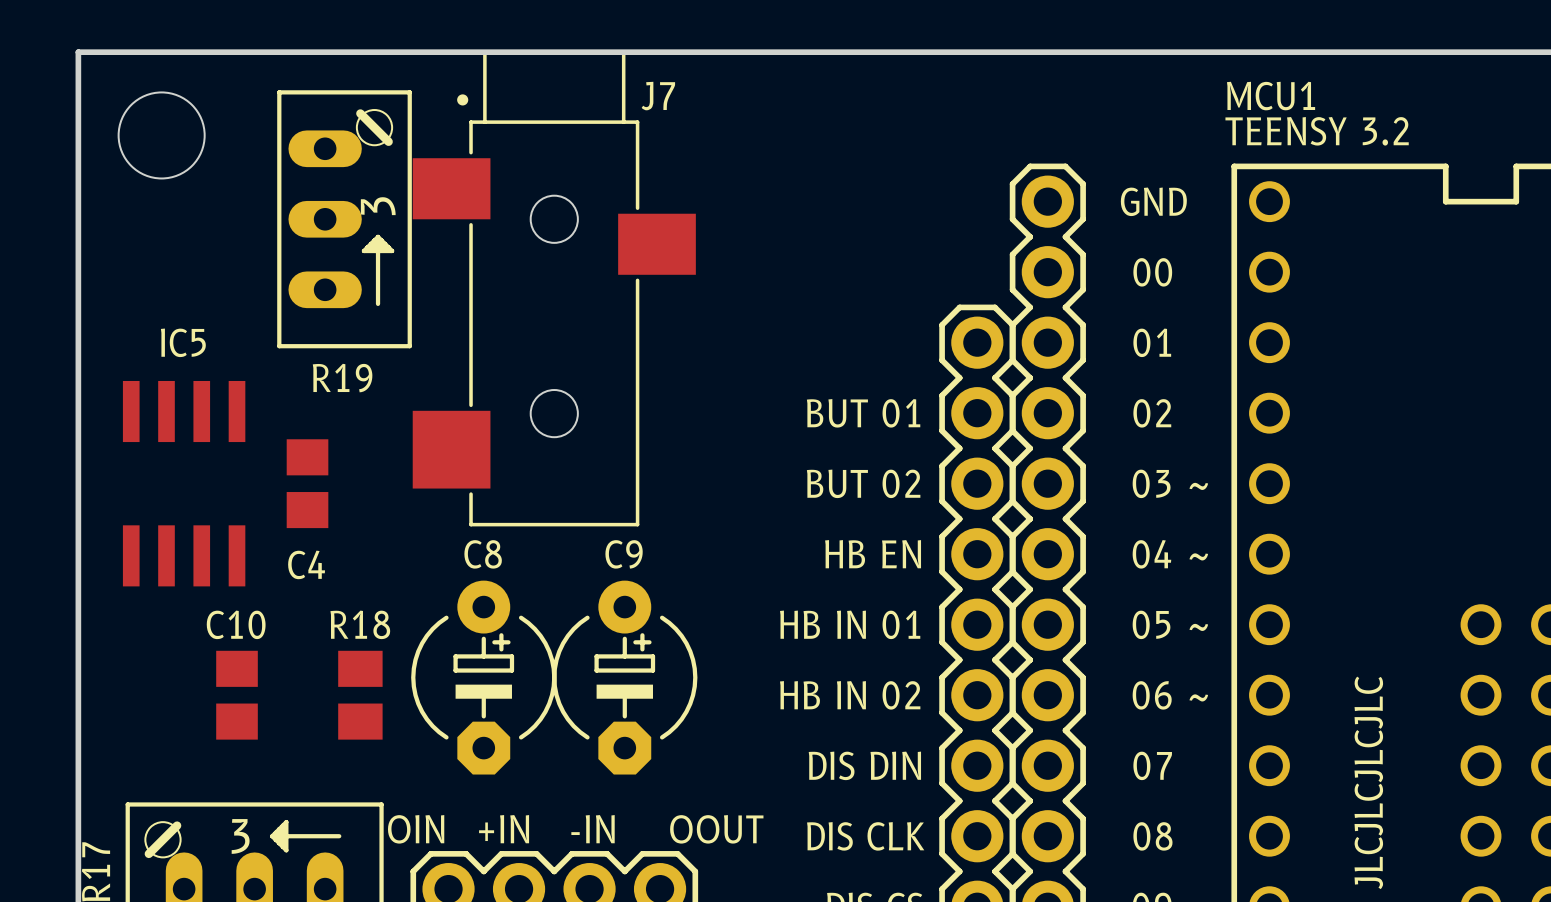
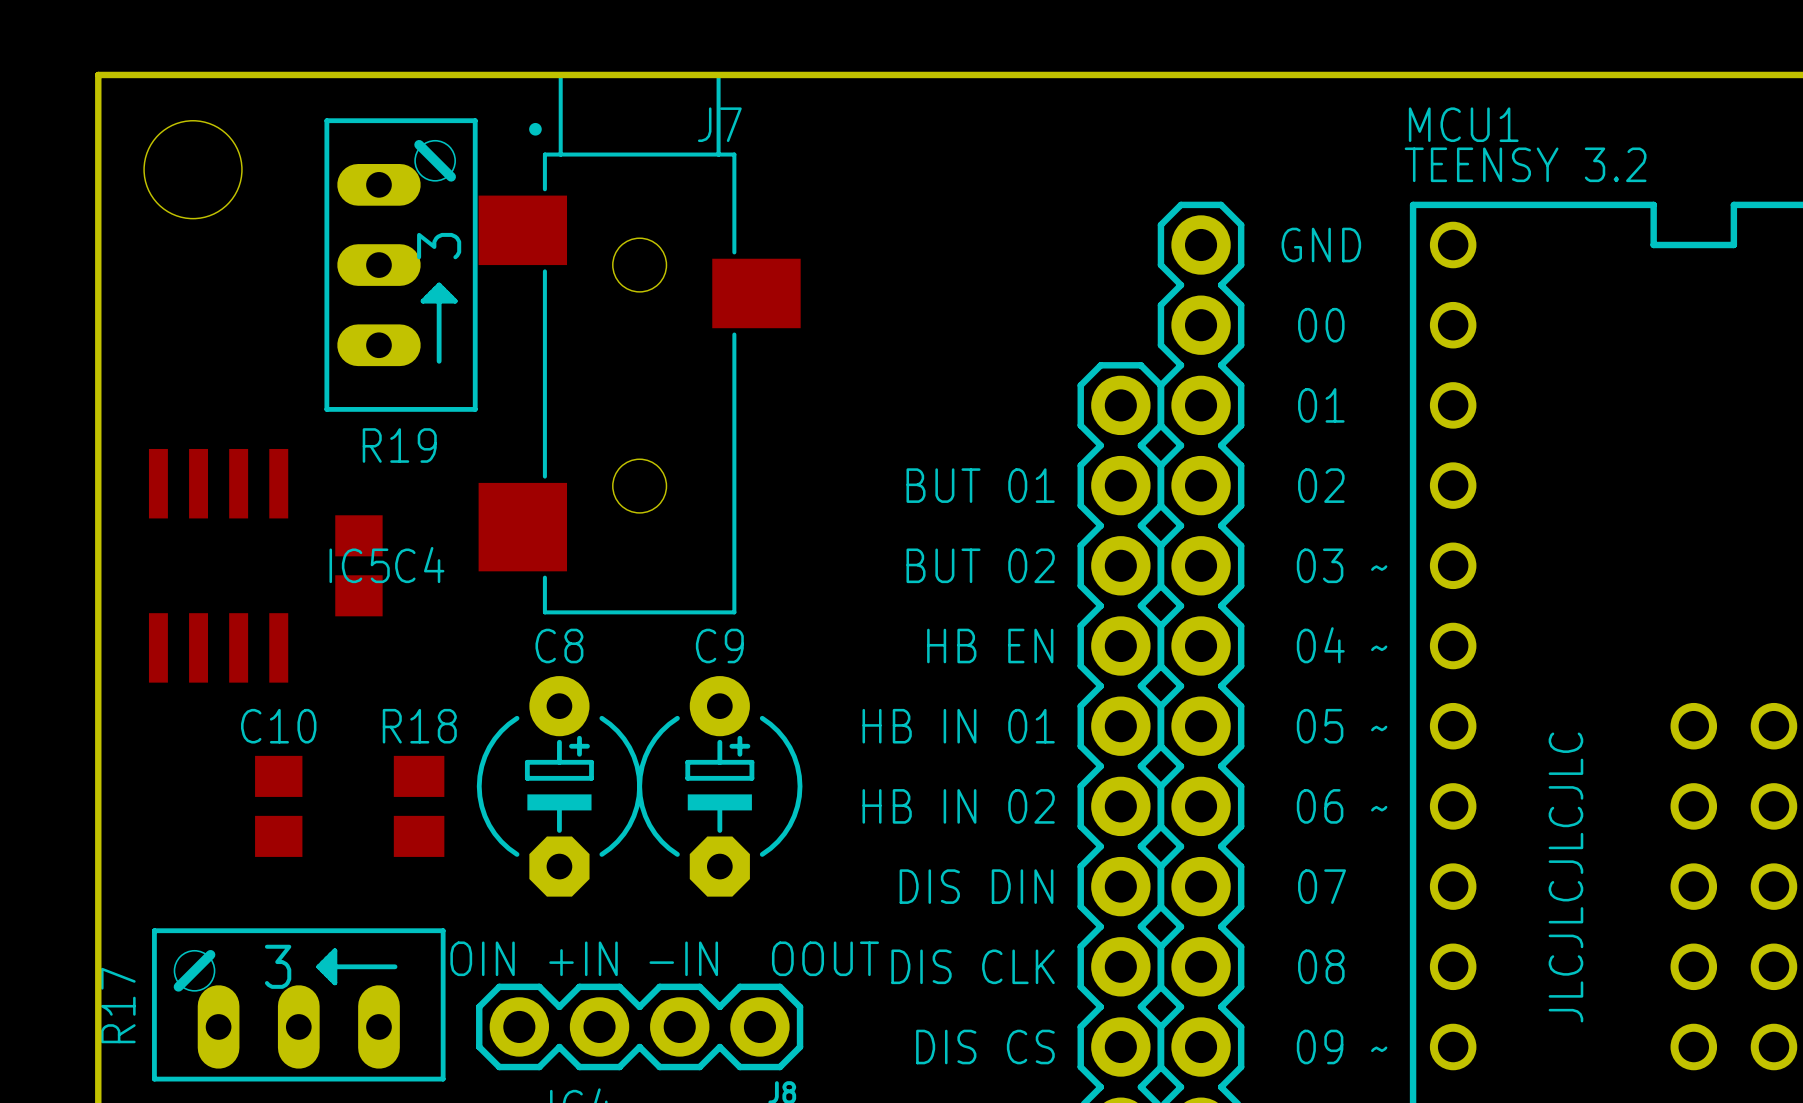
text position: J7 (658, 96) -> J7 (719, 124)
text position: IC5 (183, 342) -> IC5 (359, 565)
text position: C4 (306, 564) -> C4 (419, 565)

